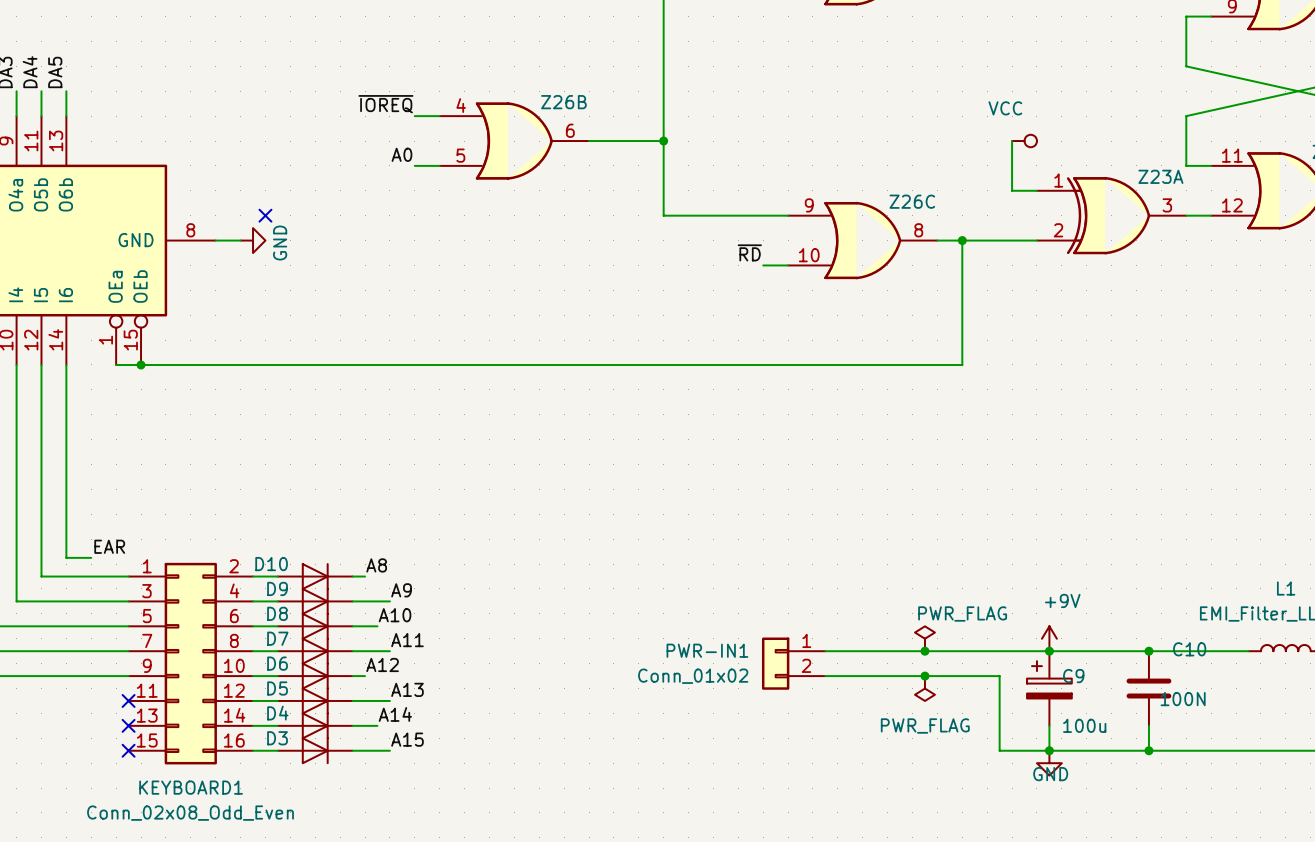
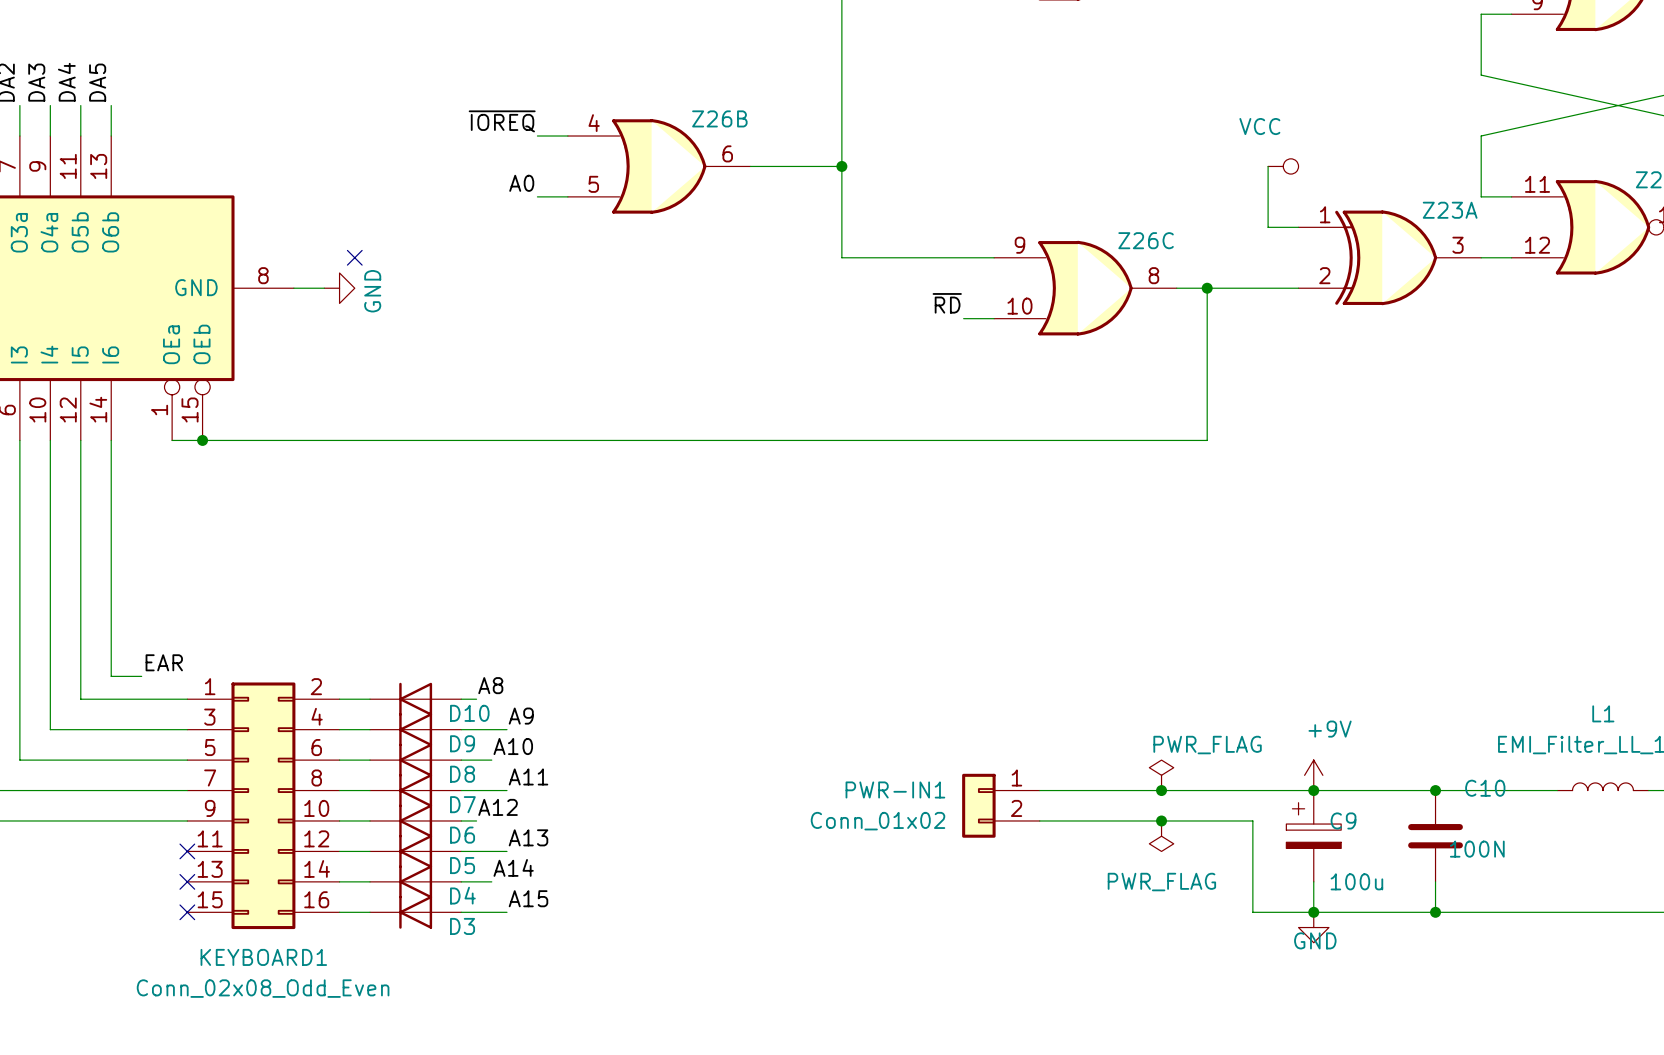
D10 rotation: 0° (315, 576) -> 180° (415, 699)
D9 rotation: 0° (315, 601) -> 180° (415, 729)
D8 rotation: 0° (315, 626) -> 180° (415, 760)
D7 rotation: 0° (315, 651) -> 180° (415, 790)
D6 rotation: 0° (315, 676) -> 180° (415, 820)
D5 rotation: 0° (315, 700) -> 180° (415, 851)
D4 rotation: 0° (315, 725) -> 180° (415, 881)
D3 rotation: 0° (315, 750) -> 180° (415, 912)

